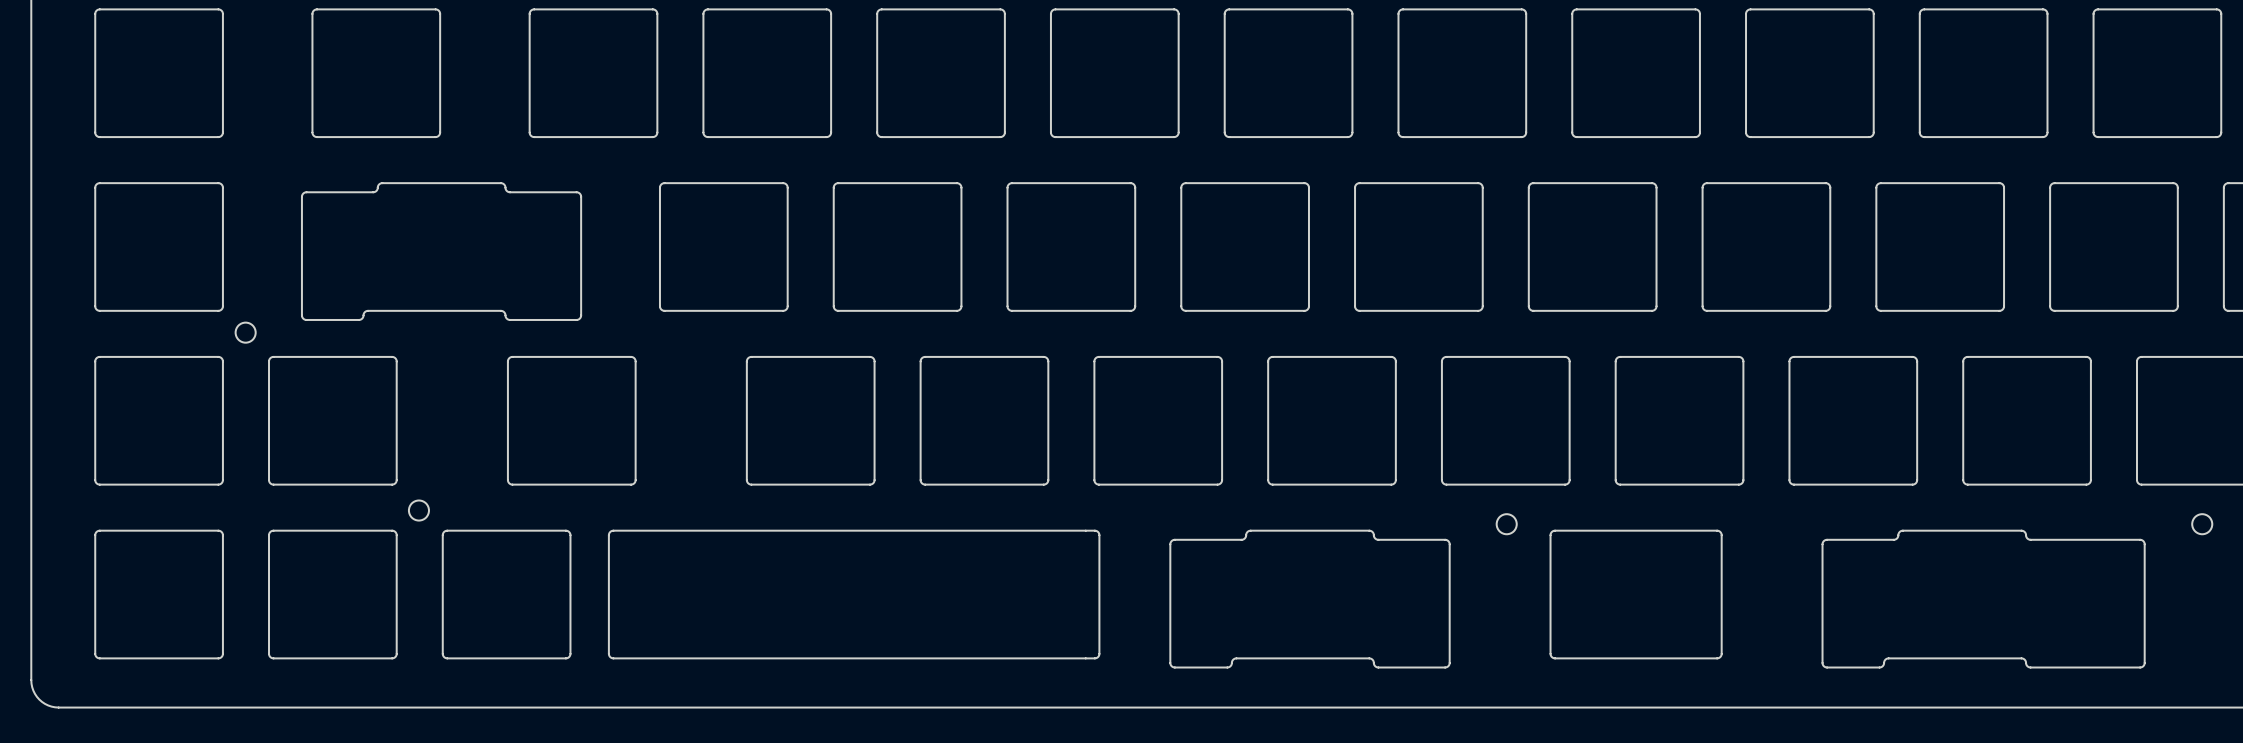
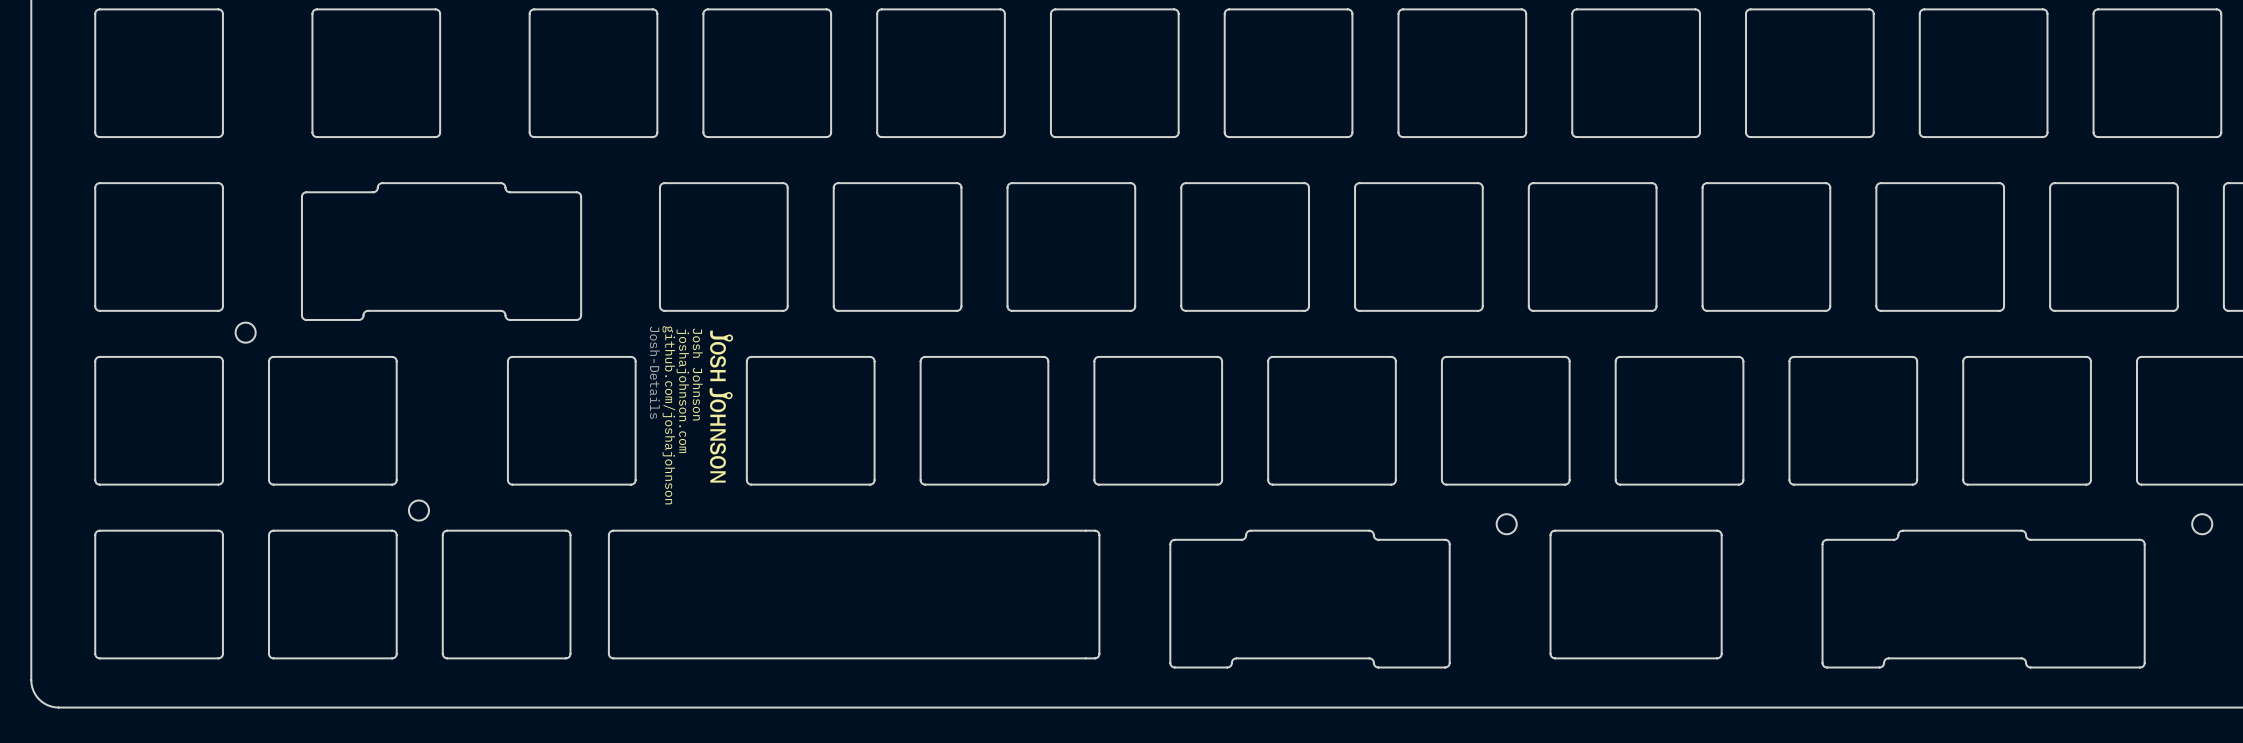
drawing: none -> [709, 330, 734, 483]

